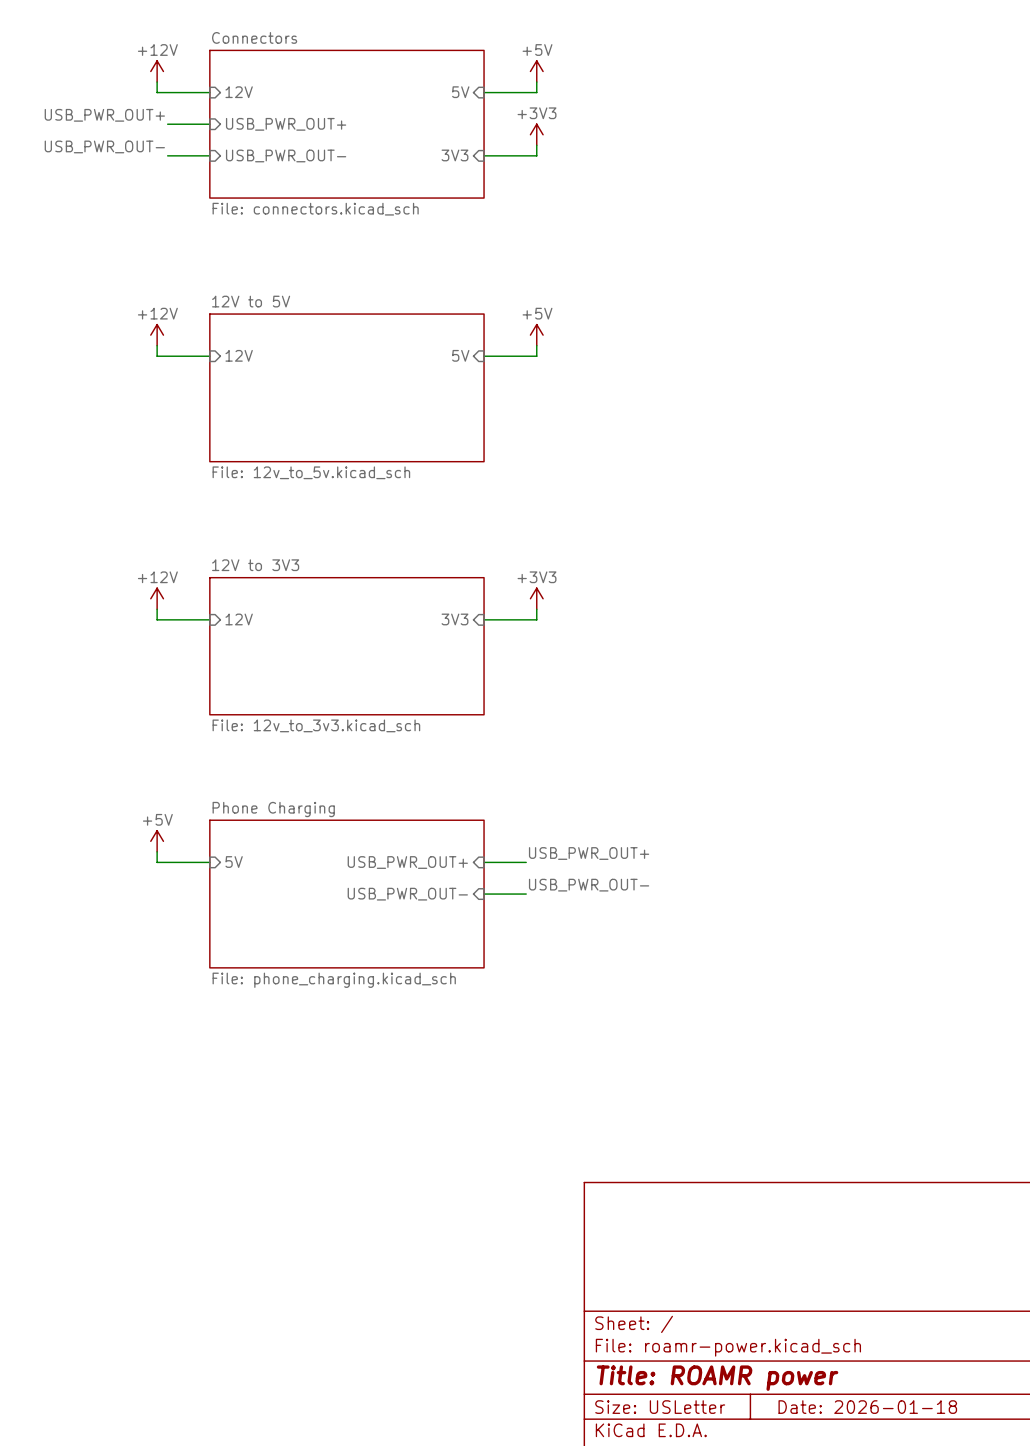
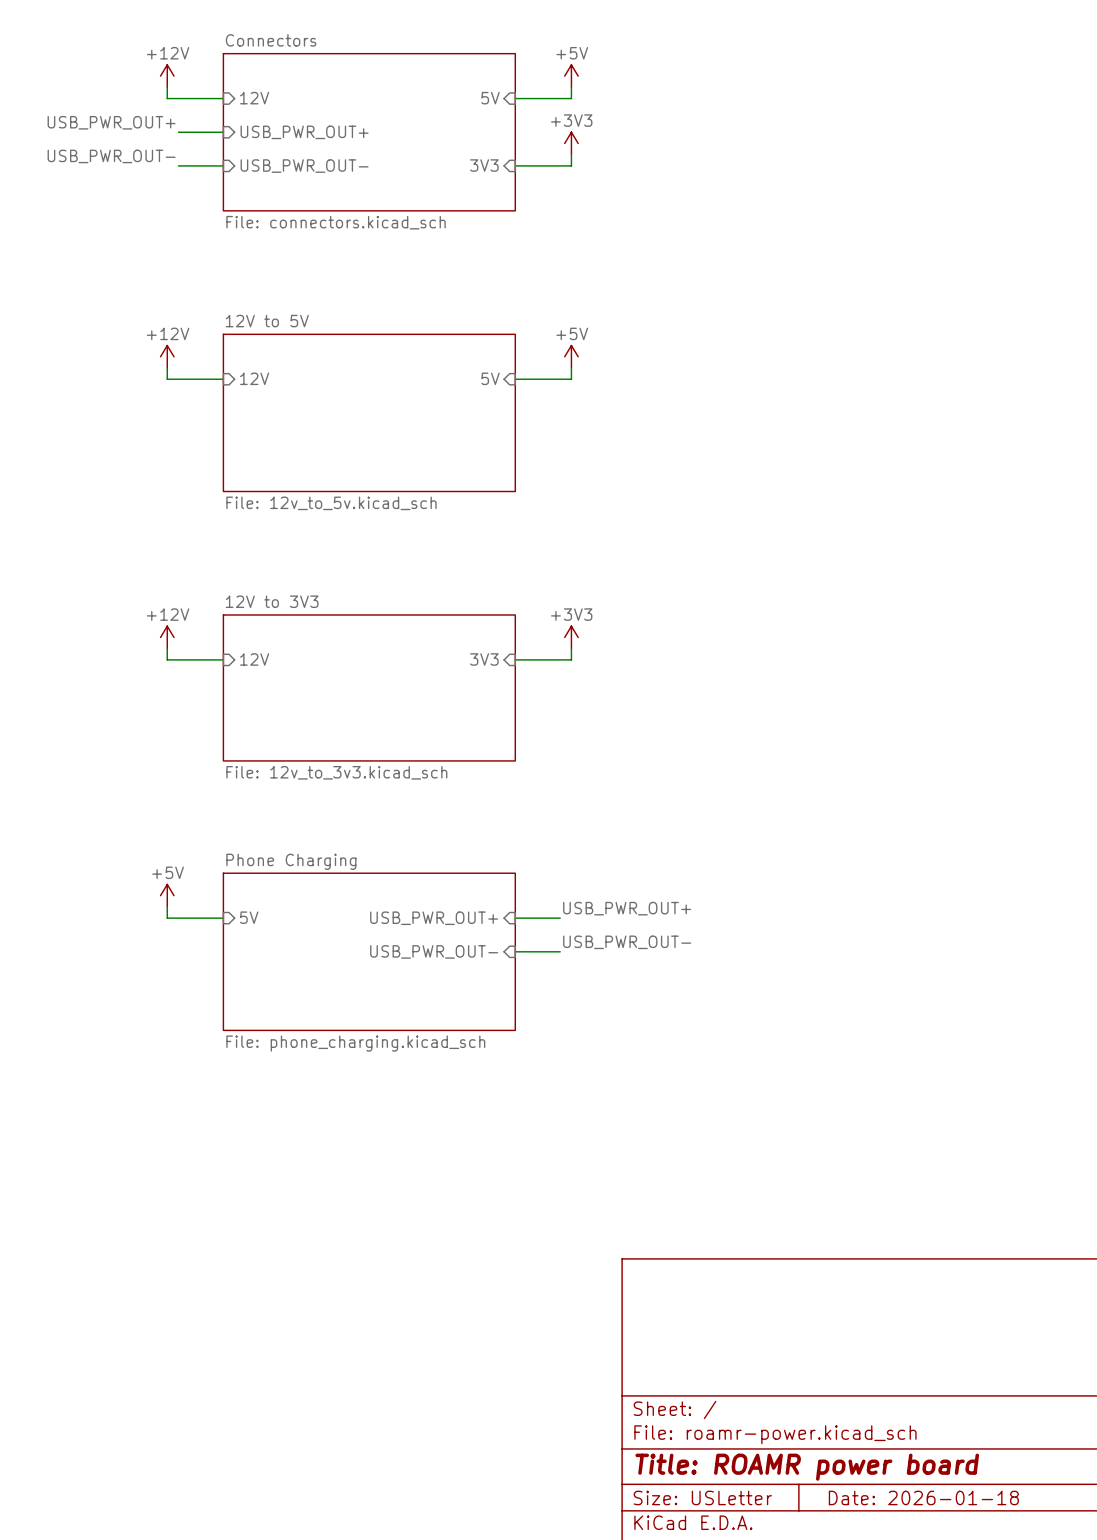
title block: Title: ROAMR power (717, 1378) -> Title: ROAMR power board (807, 1467)

